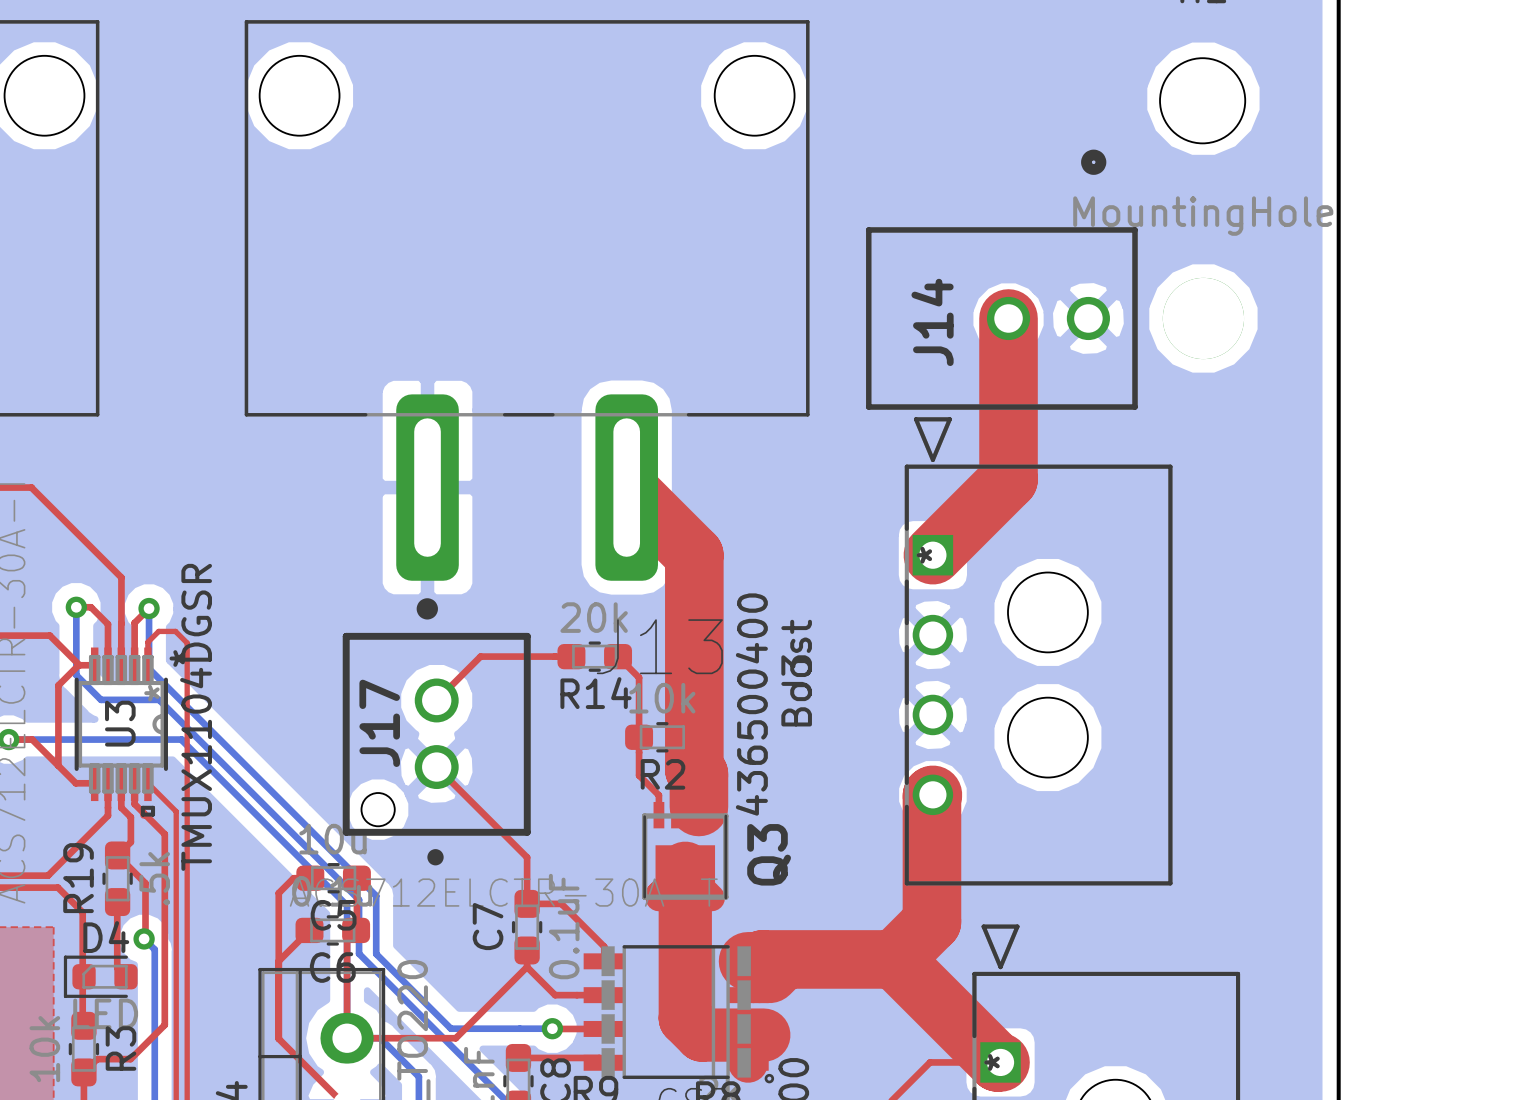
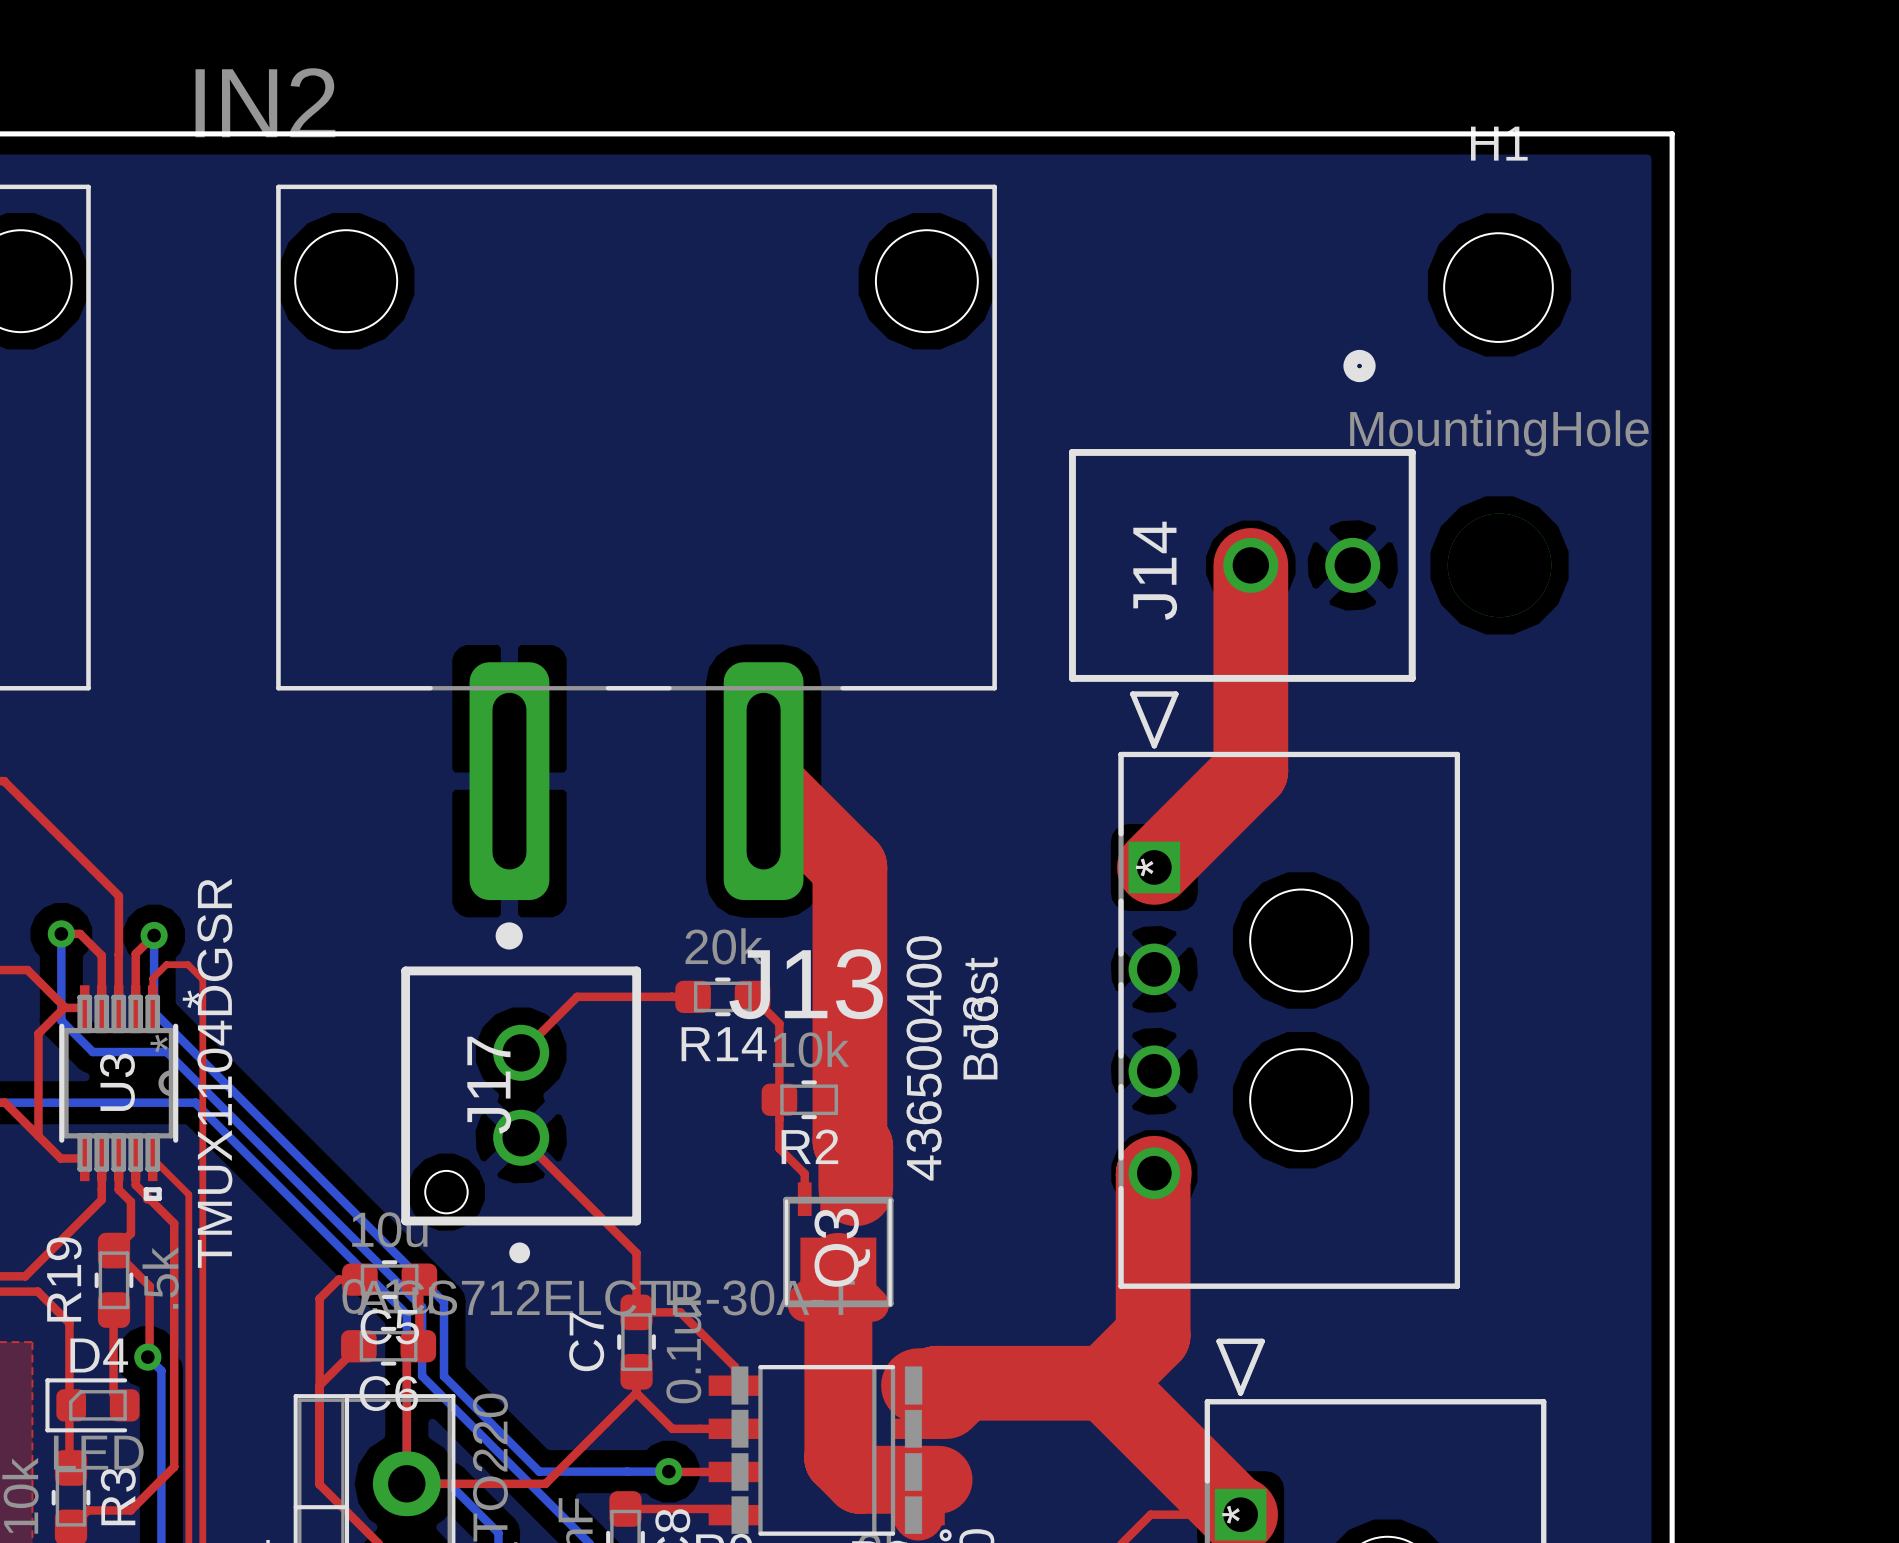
J17 name position: J17 (379, 723) -> J17 (489, 1085)
Q3 name position: Q3 (769, 854) -> Q3 (842, 1247)

